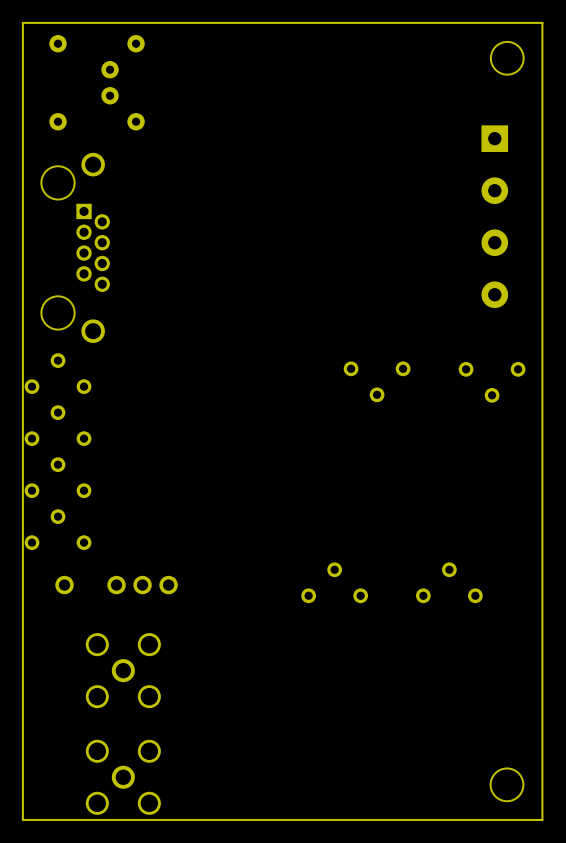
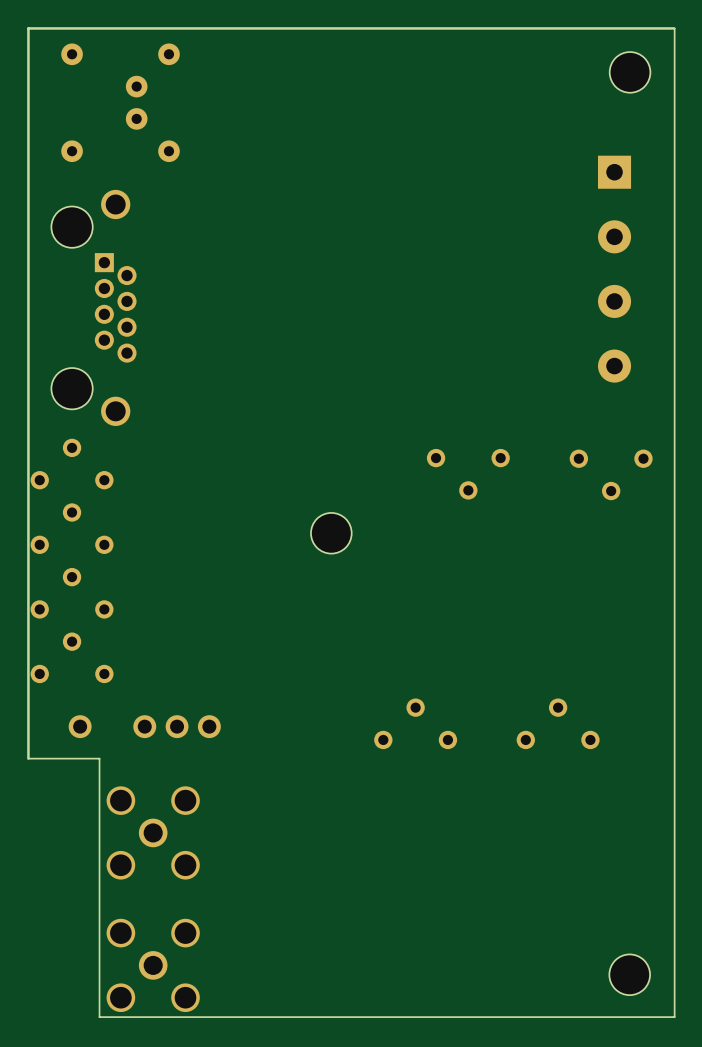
board edge: (542, 22) (542, 819) (22, 819) (22, 610) -> (673, 28) (674, 1017) (99, 1017) (99, 758) (28, 758)
part: none -> (331, 533)

